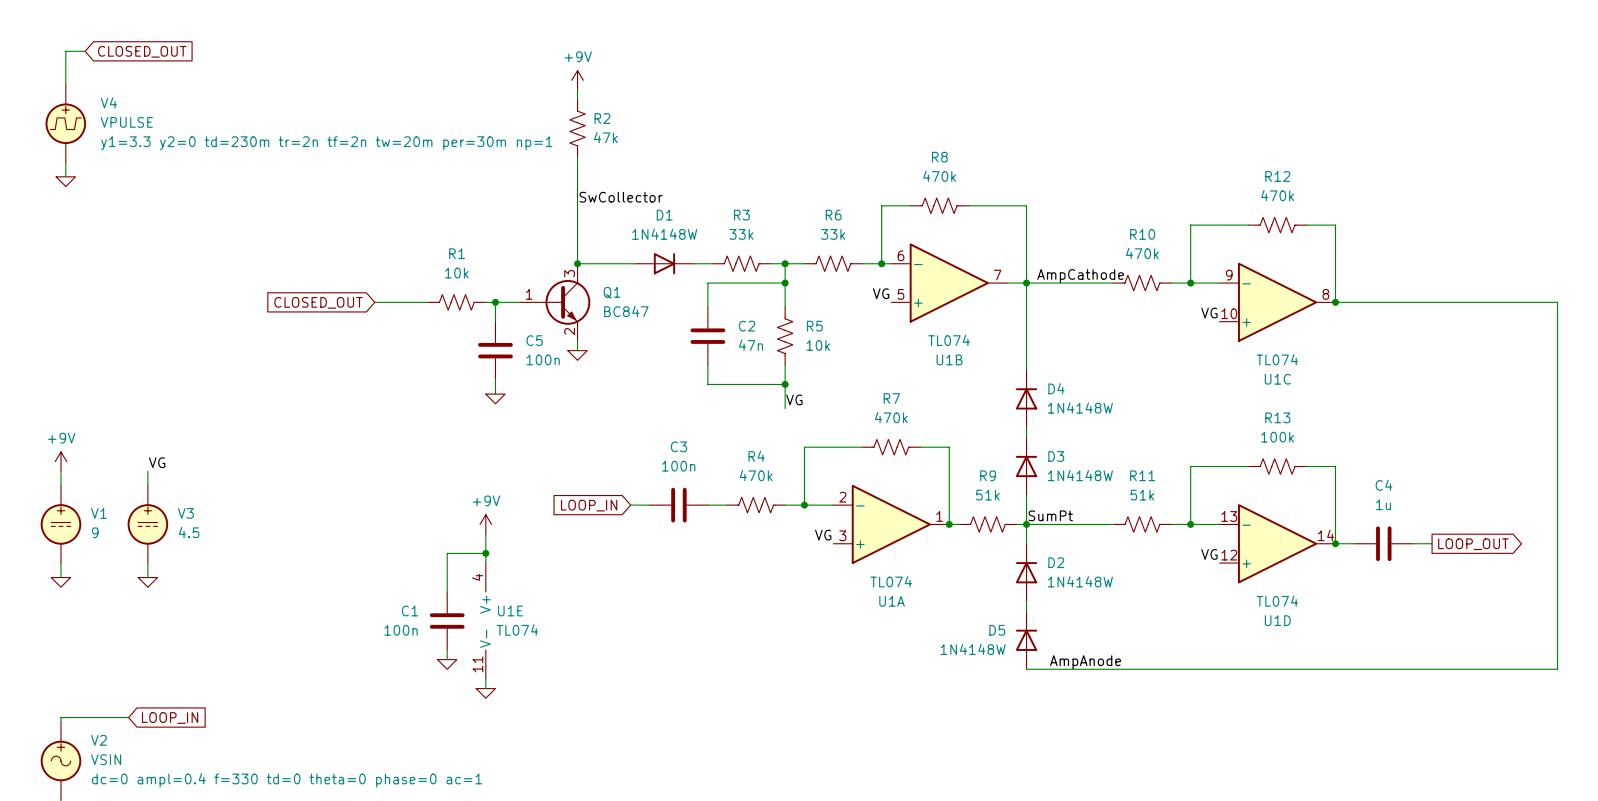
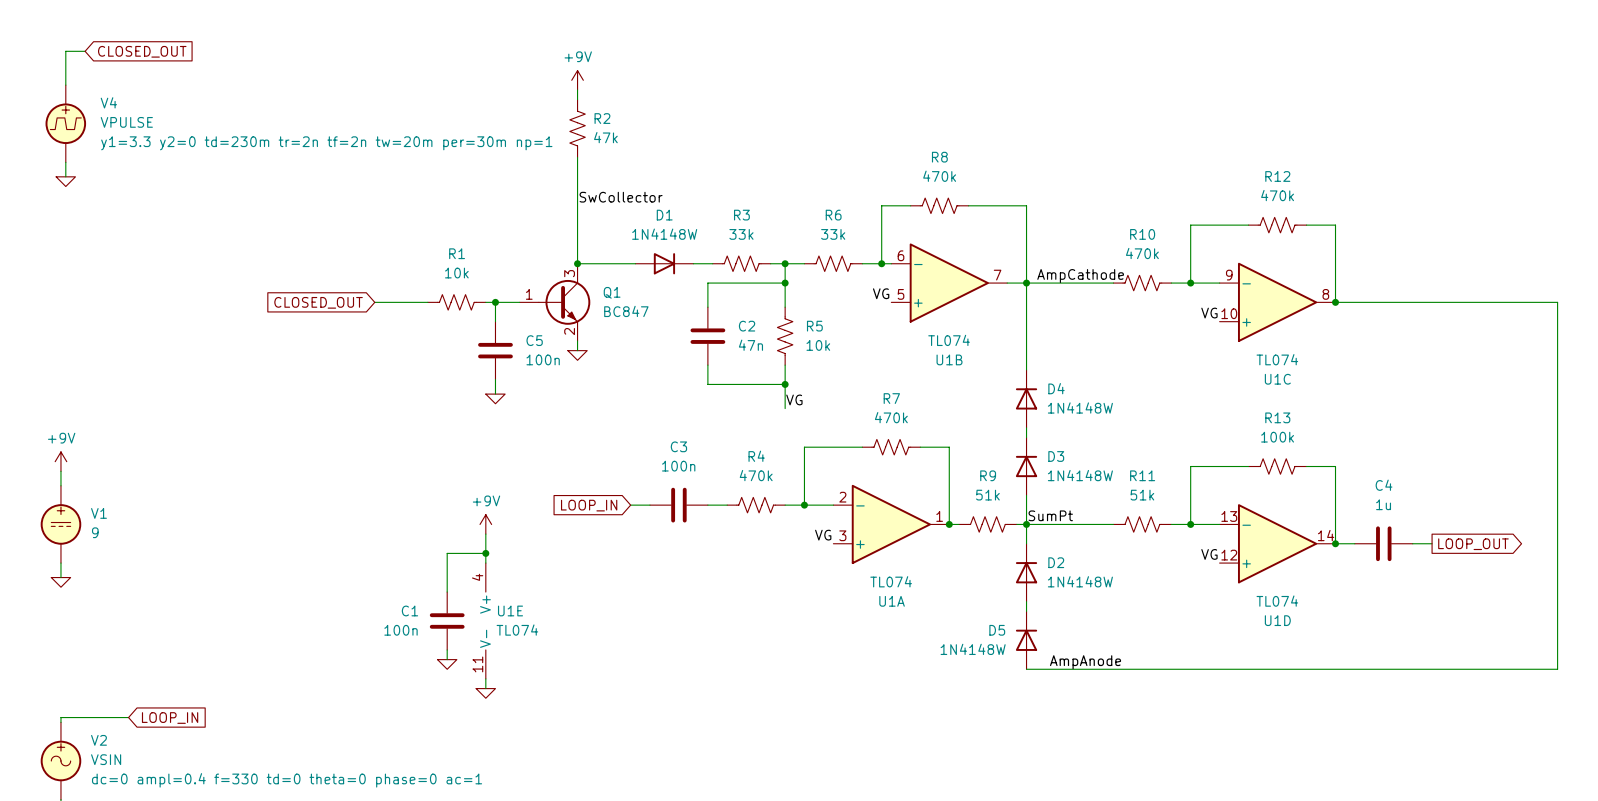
label: VG (157, 462) -> none
wire: (147, 471) (147, 485) -> none
V3: 4.5 (147, 524) -> none
wire: (147, 563) (147, 577) -> none
power symbol: (147, 582) -> none

